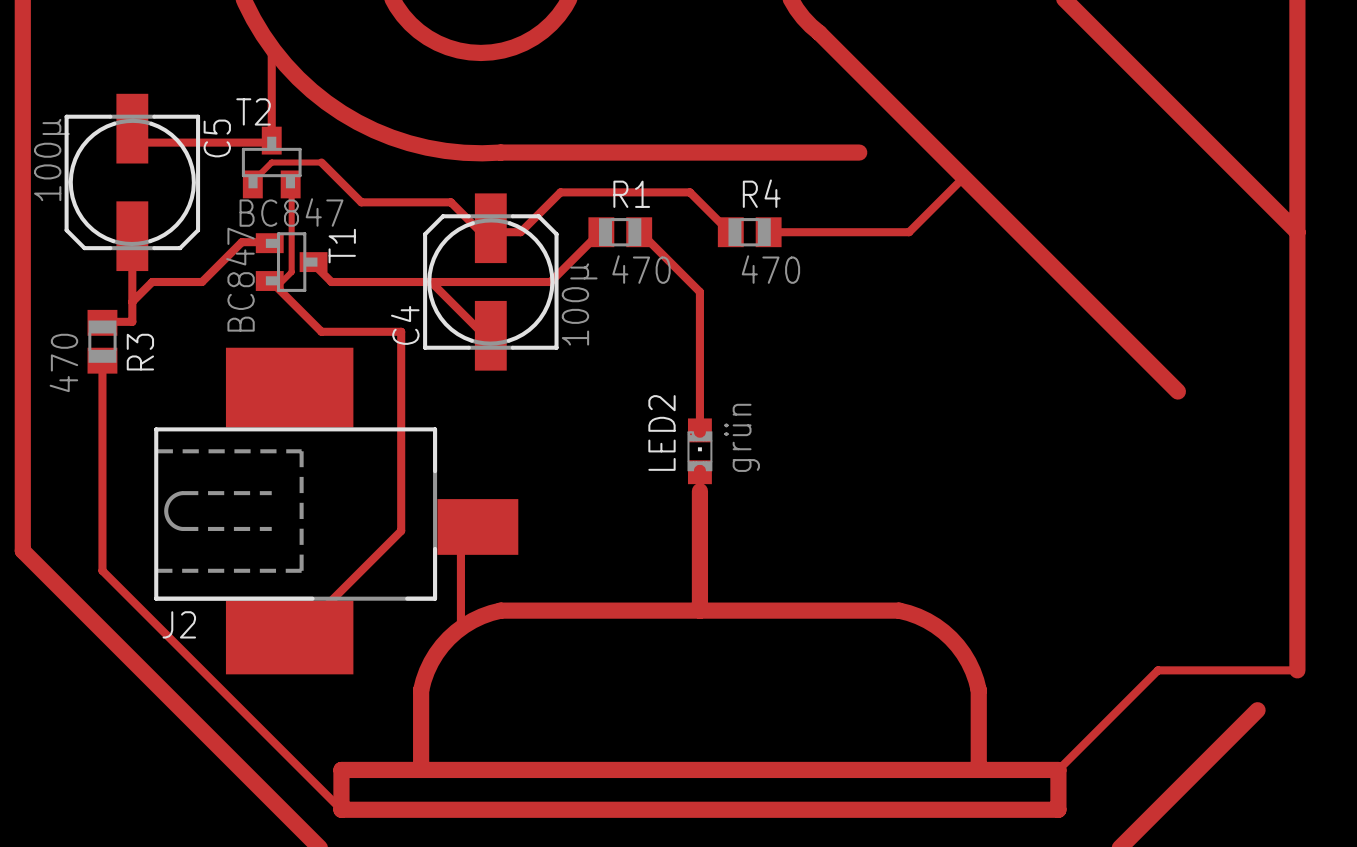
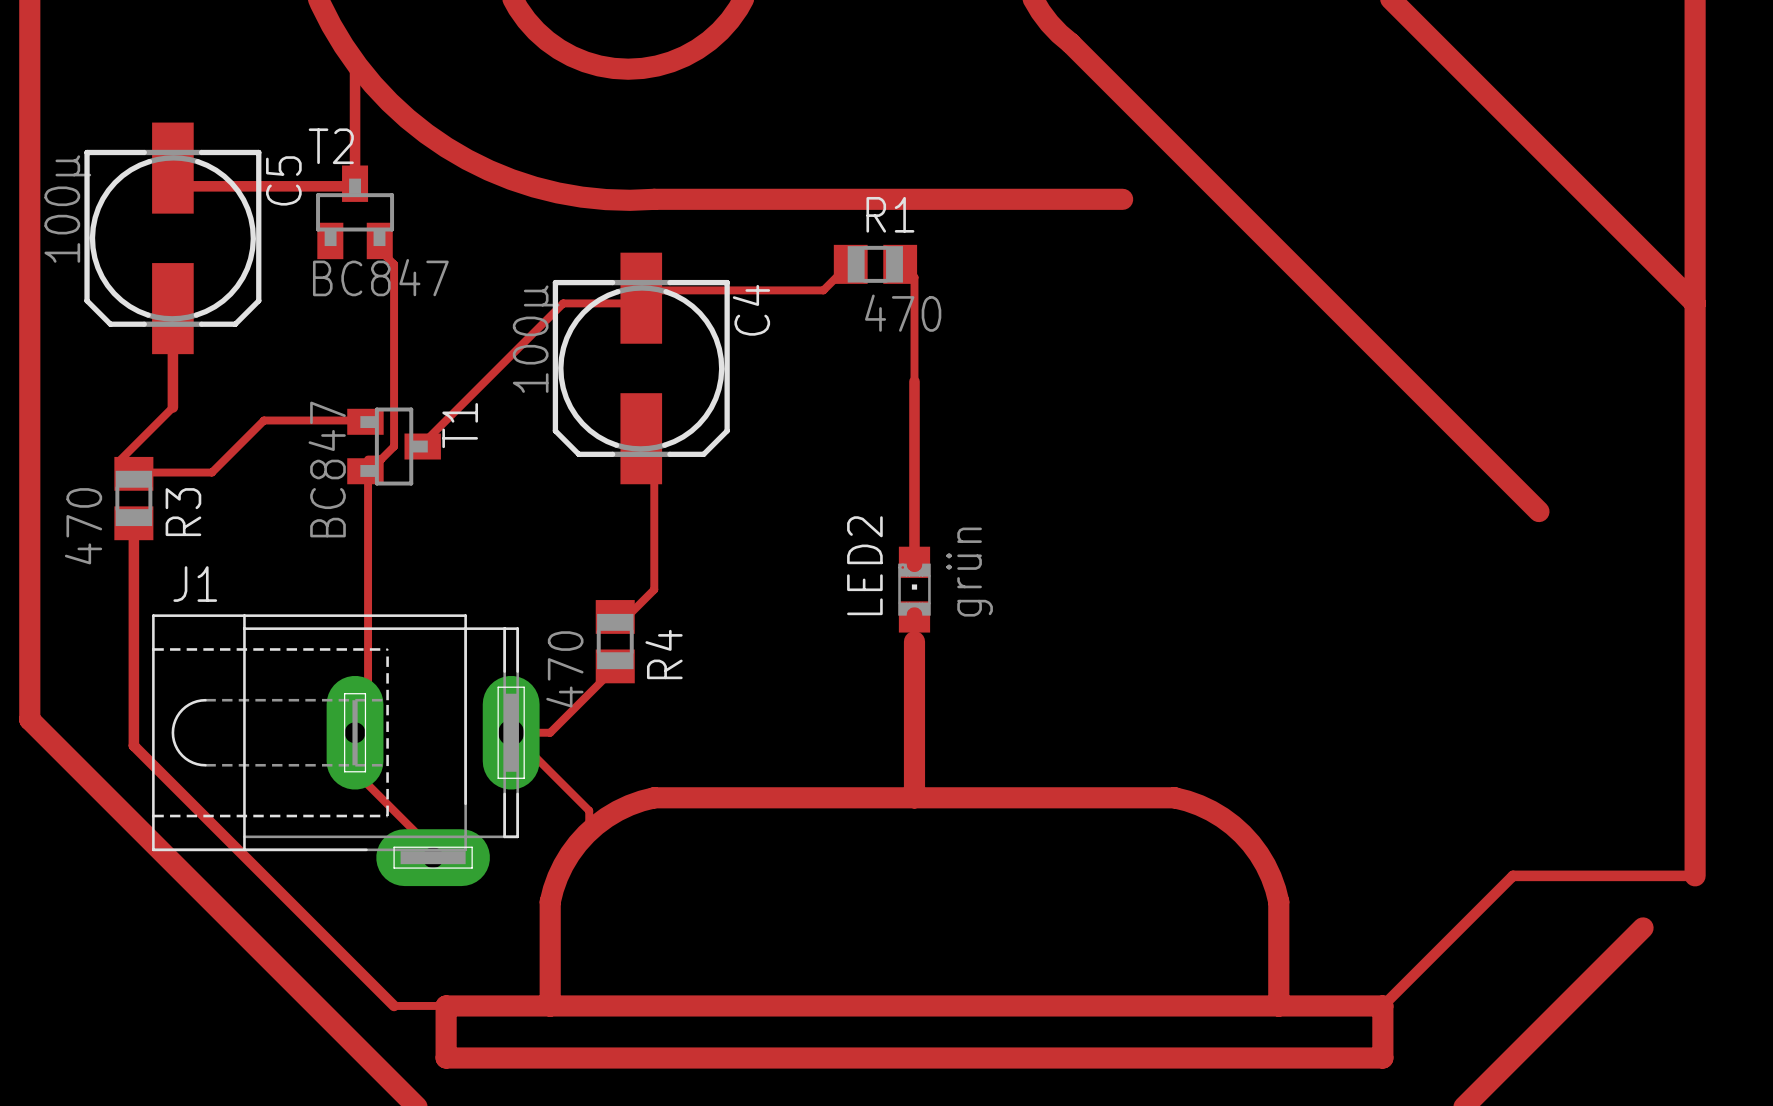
top track: (251, 182) (271, 162) (321, 162) (361, 202) (450, 202) (480, 232) -> (420, 446) (563, 303) (628, 303)
top track: (958, 182) (909, 232) (769, 232) -> none
top track: (291, 192) (291, 272) (281, 282) -> (381, 251) (394, 264) (394, 446) (381, 459) (368, 459)
top track: none -> (849, 264) (823, 290) (641, 290)
top track: (490, 232) (520, 232) (560, 192) (689, 192) (729, 232) -> none
top track: (600, 232) (550, 282) (331, 282) (311, 262) -> none
R1 position: (620, 232) -> (875, 264)
top track: (640, 232) (699, 291) -> (901, 264) (914, 277) (914, 381)
R4 rotation: 0° (749, 232) -> 90° clockwise (615, 641)
R4 position: (749, 232) -> (615, 641)
top track: (271, 242) (241, 242) (202, 282) (152, 282) (132, 301) -> none
T1 position: (291, 262) -> (394, 446)
top track: (271, 282) (321, 331) (401, 331) (401, 530) (321, 610) -> none
top track: (431, 282) (490, 341) -> none
C4 rotation: 0° (490, 282) -> 180° (641, 368)
top track: (132, 311) (132, 321) (102, 321) -> (172, 407) (120, 459)
top track: none -> (355, 420) (263, 420) (211, 472) (133, 472)
R3 position: (102, 341) -> (133, 498)
top track: none -> (654, 446) (654, 589) (615, 628)
top track: none -> (368, 472) (368, 719) (355, 732) (355, 771) (446, 862)
top track: (102, 371) (102, 401) -> none
J2: (336, 511) -> none
top track: none -> (615, 667) (550, 732) (511, 732) (589, 810) (589, 823)
top track: (460, 550) (460, 630) -> none
J1: none -> (345, 750)
top track: (301, 769) (341, 809) -> (394, 1005) (446, 1005)

